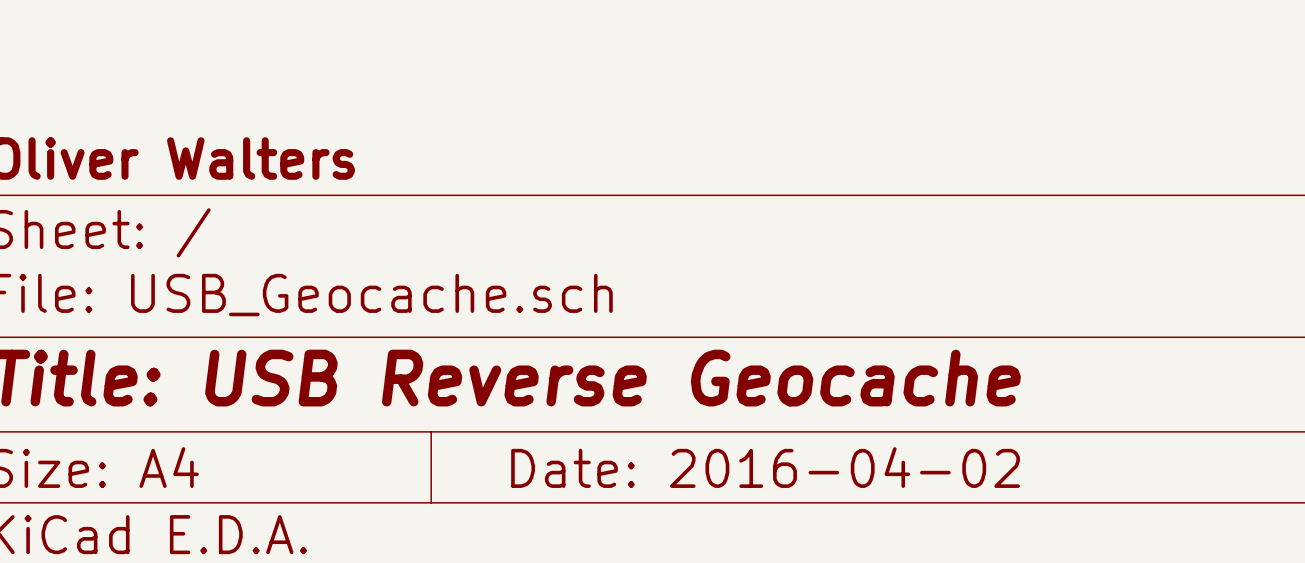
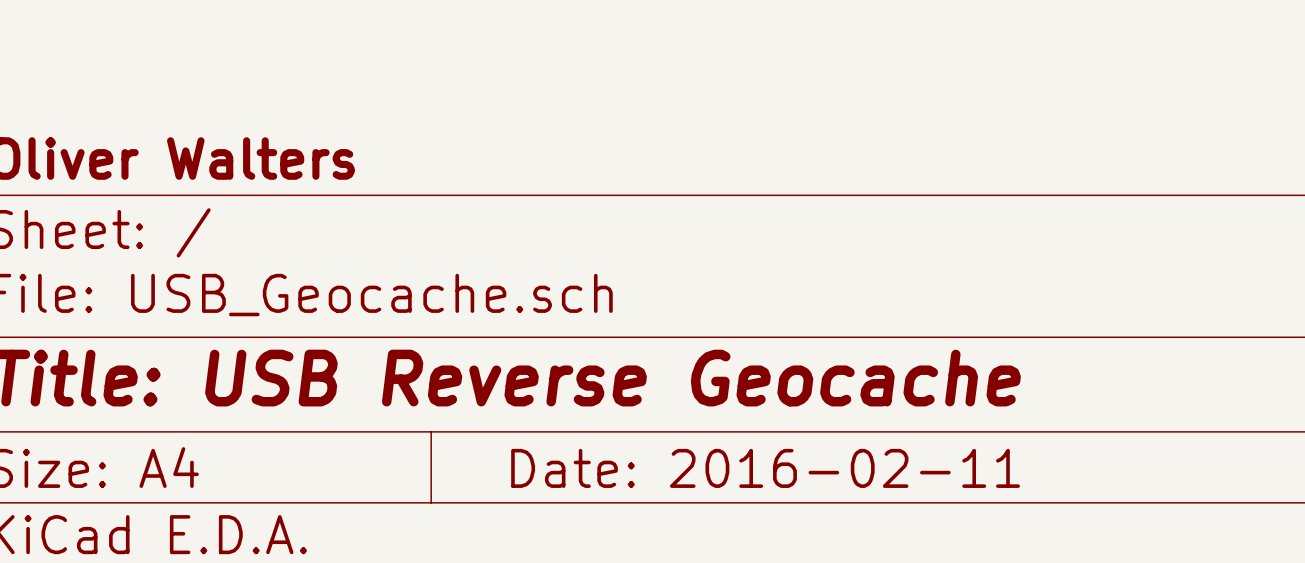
title block: Date: 2016-04-02 (765, 467) -> Date: 2016-02-11 (765, 468)

